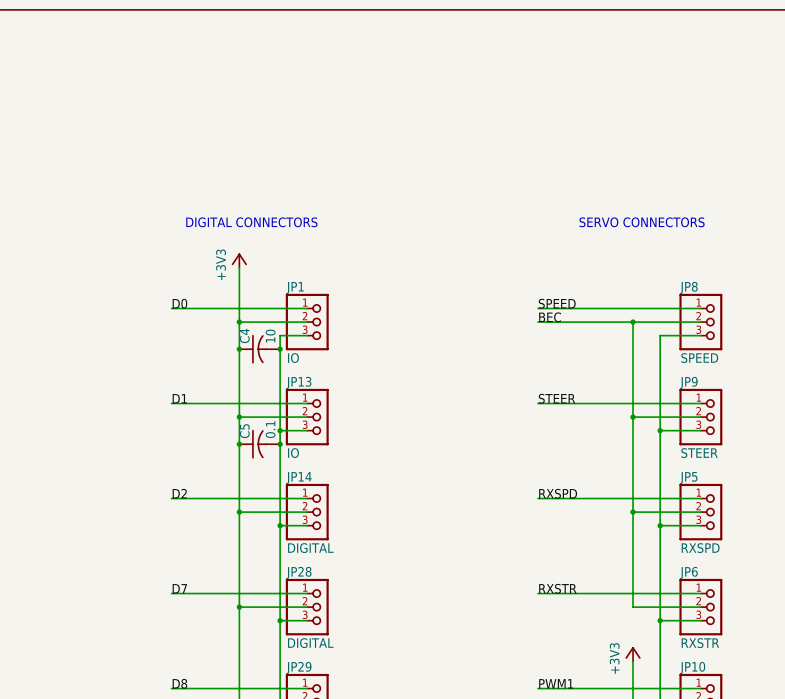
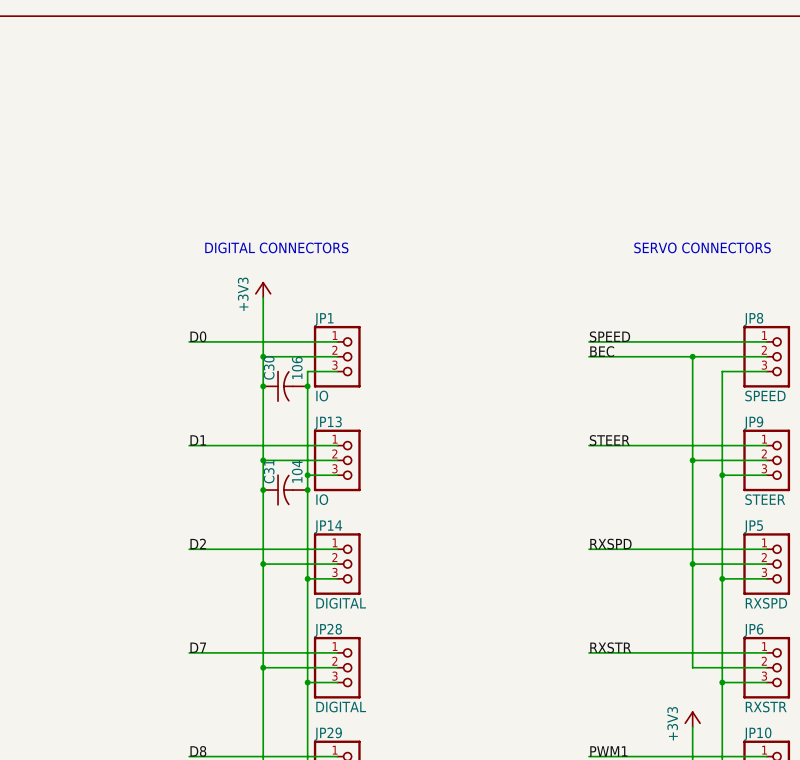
C4 name: C4 (244, 335) -> C30 (269, 367)
C4 value: 10 (270, 336) -> 106 (297, 367)
C5 value: 0.1 (270, 429) -> 104 (297, 471)
C5 name: C5 (244, 431) -> C31 (269, 471)

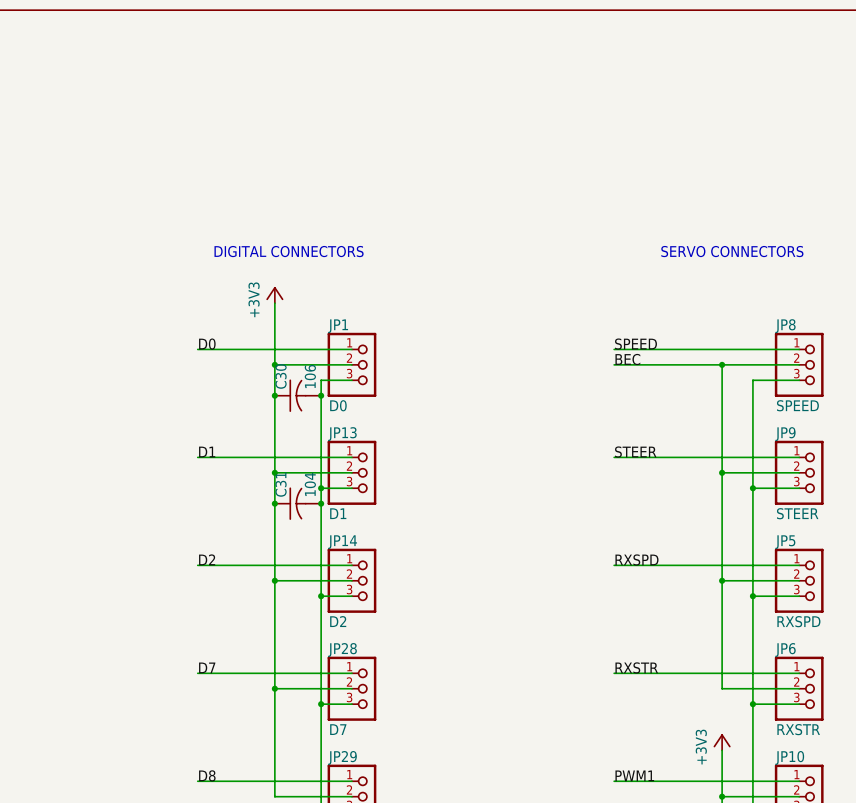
JP1 value: IO (322, 396) -> D0 (338, 405)
JP13 value: IO (322, 499) -> D1 (338, 513)
JP14 value: DIGITAL (341, 603) -> D2 (338, 621)
JP28 value: DIGITAL (341, 706) -> D7 (338, 729)

